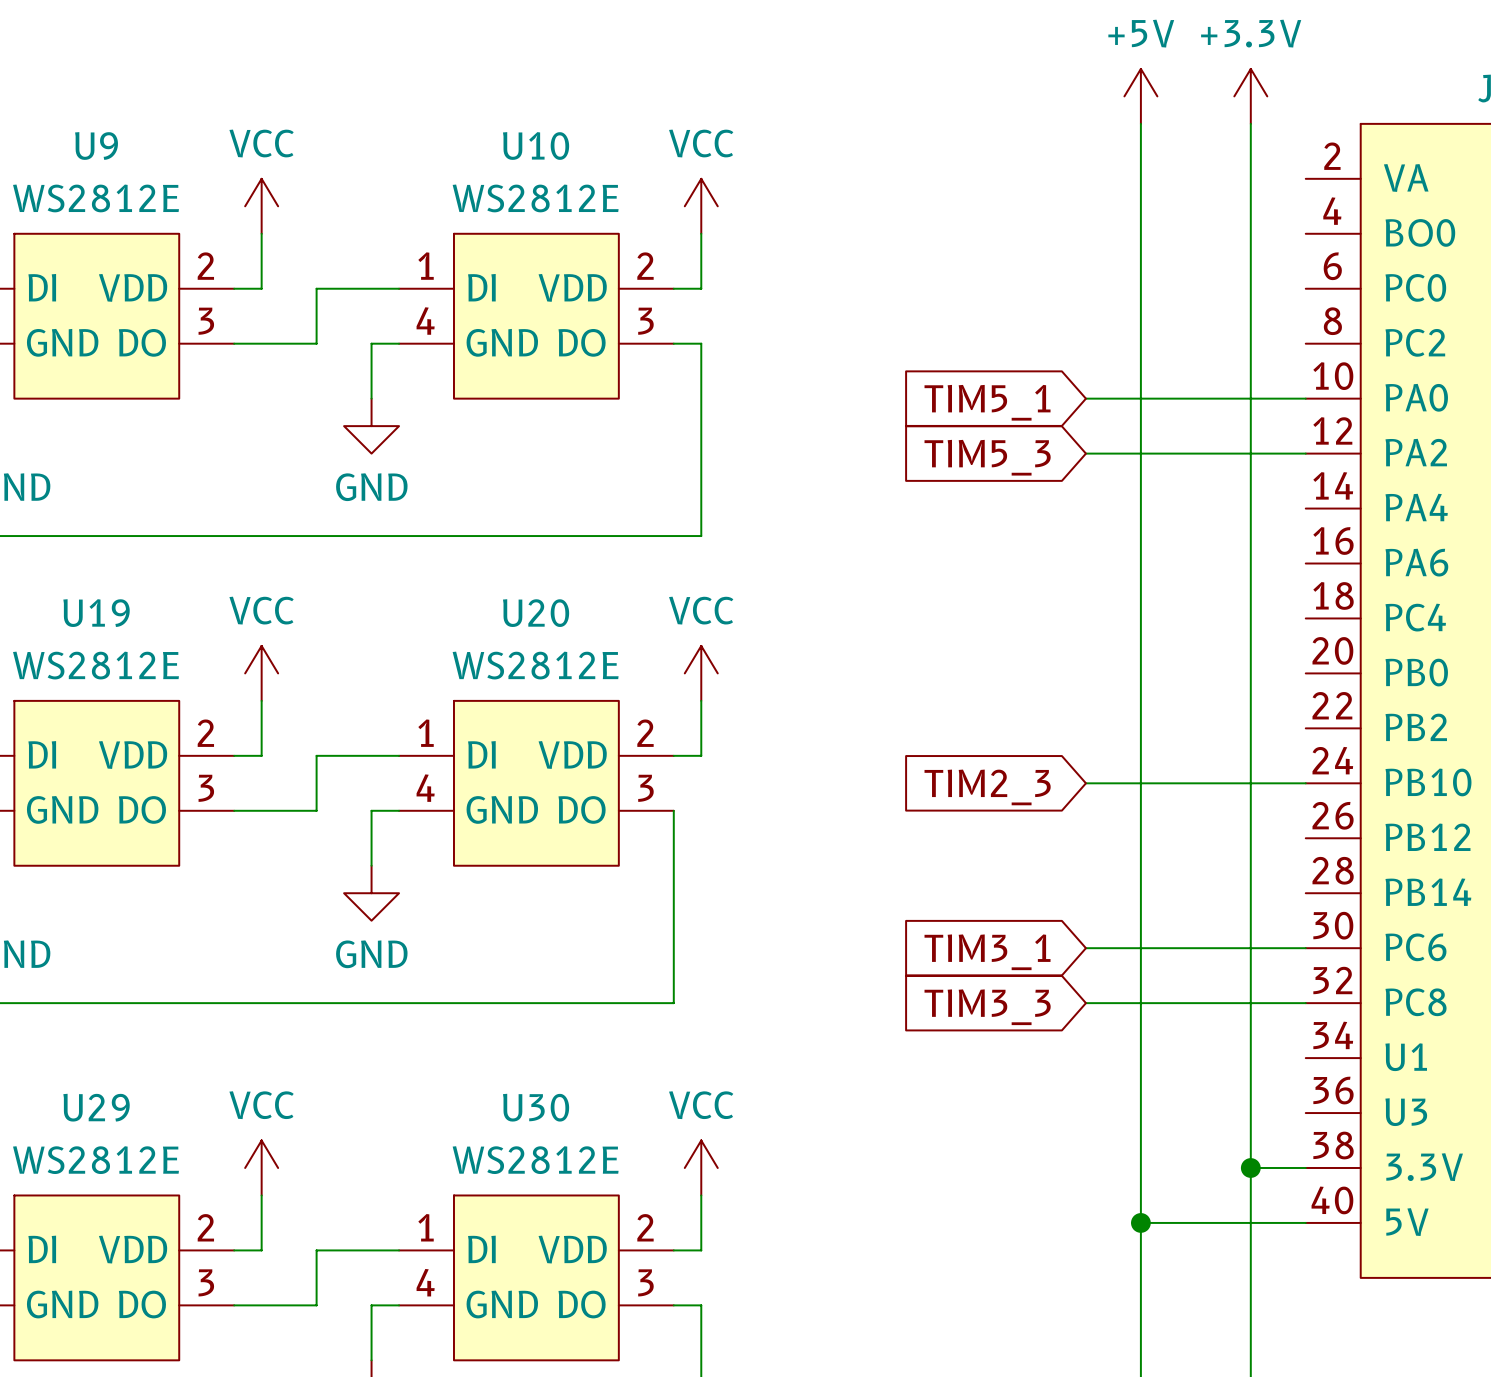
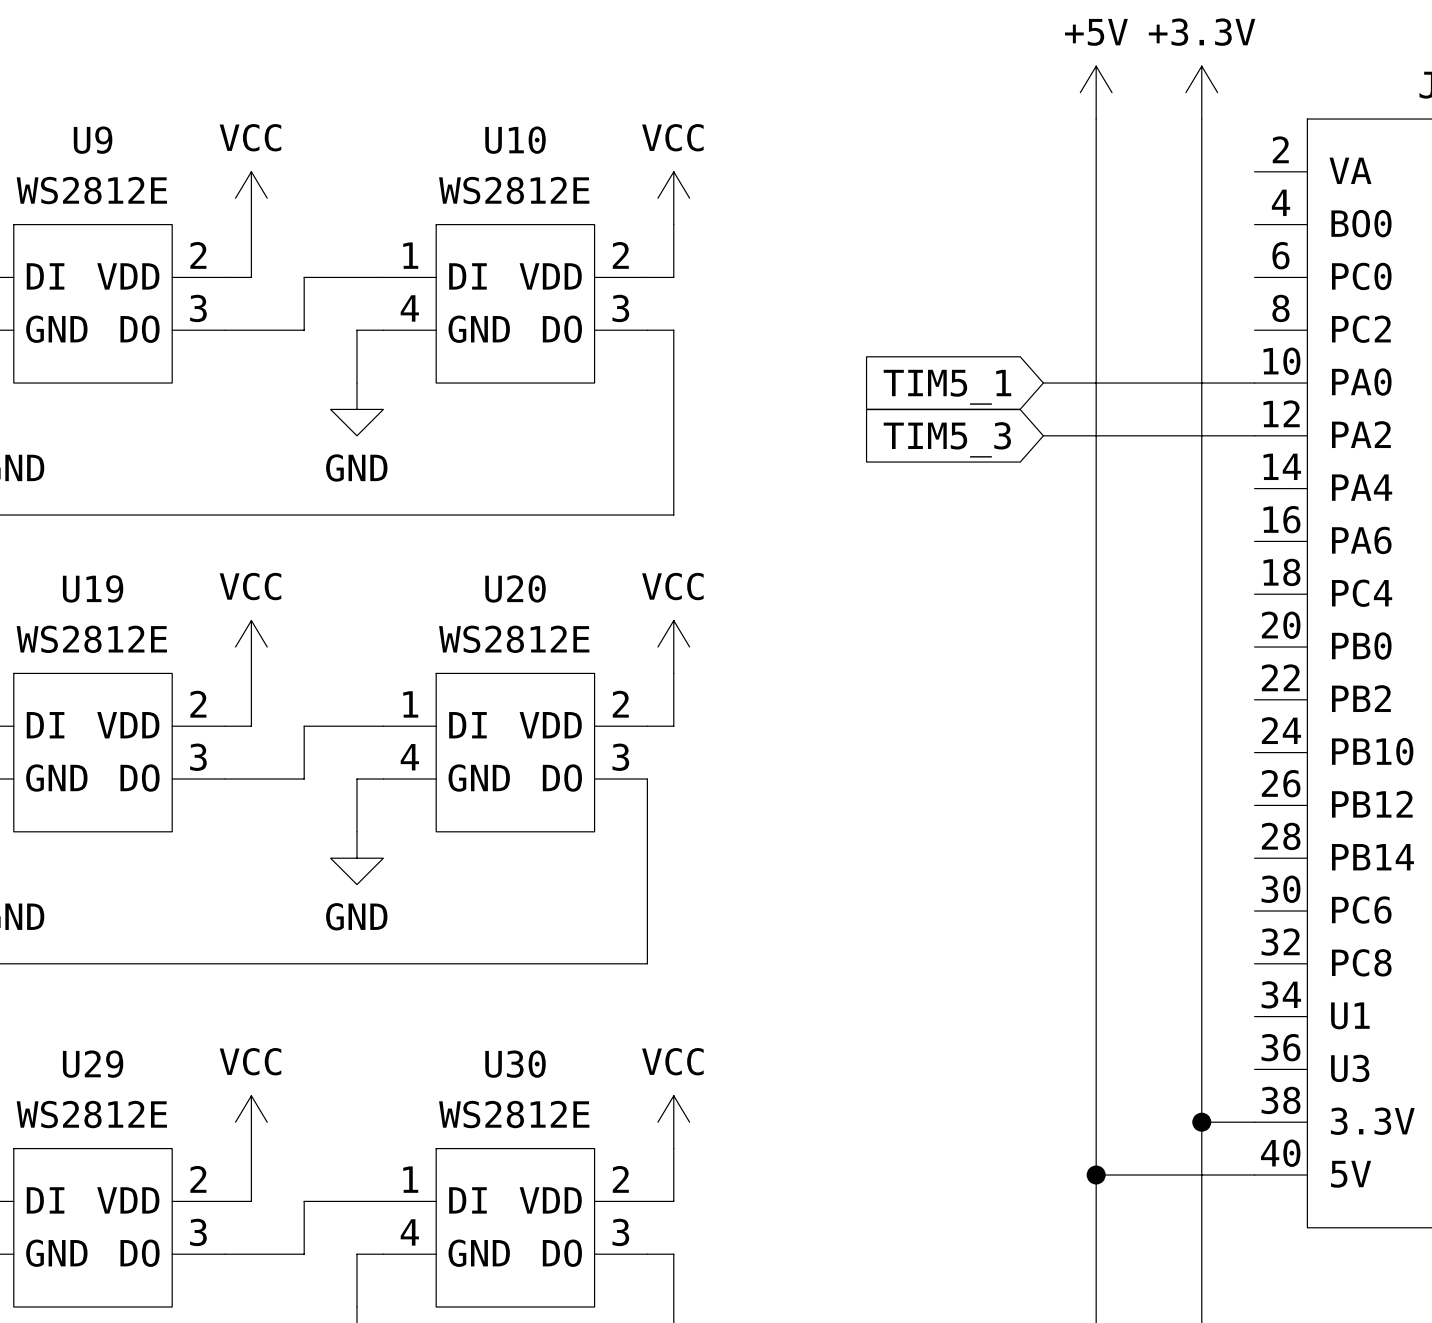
wire: (1085, 783) (1305, 783) -> none
global label: TIM2_3 (987, 787) -> none
wire: (1085, 948) (1305, 948) -> none
global label: TIM3_1 (987, 952) -> none
wire: (1085, 1003) (1305, 1003) -> none
global label: TIM3_3 (987, 1007) -> none

